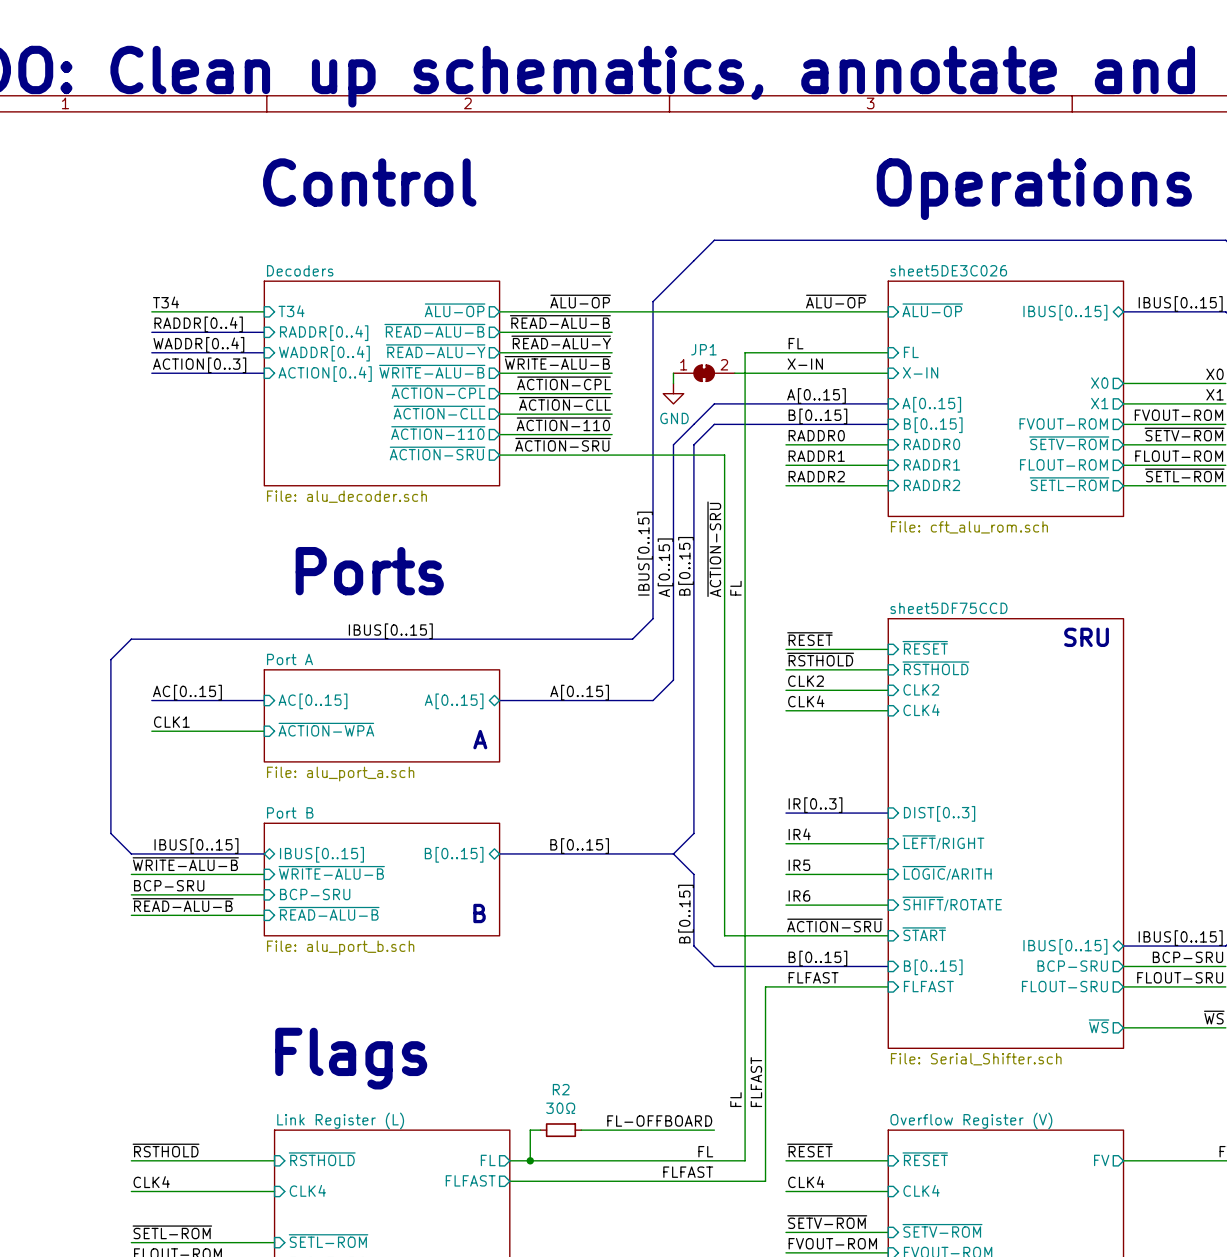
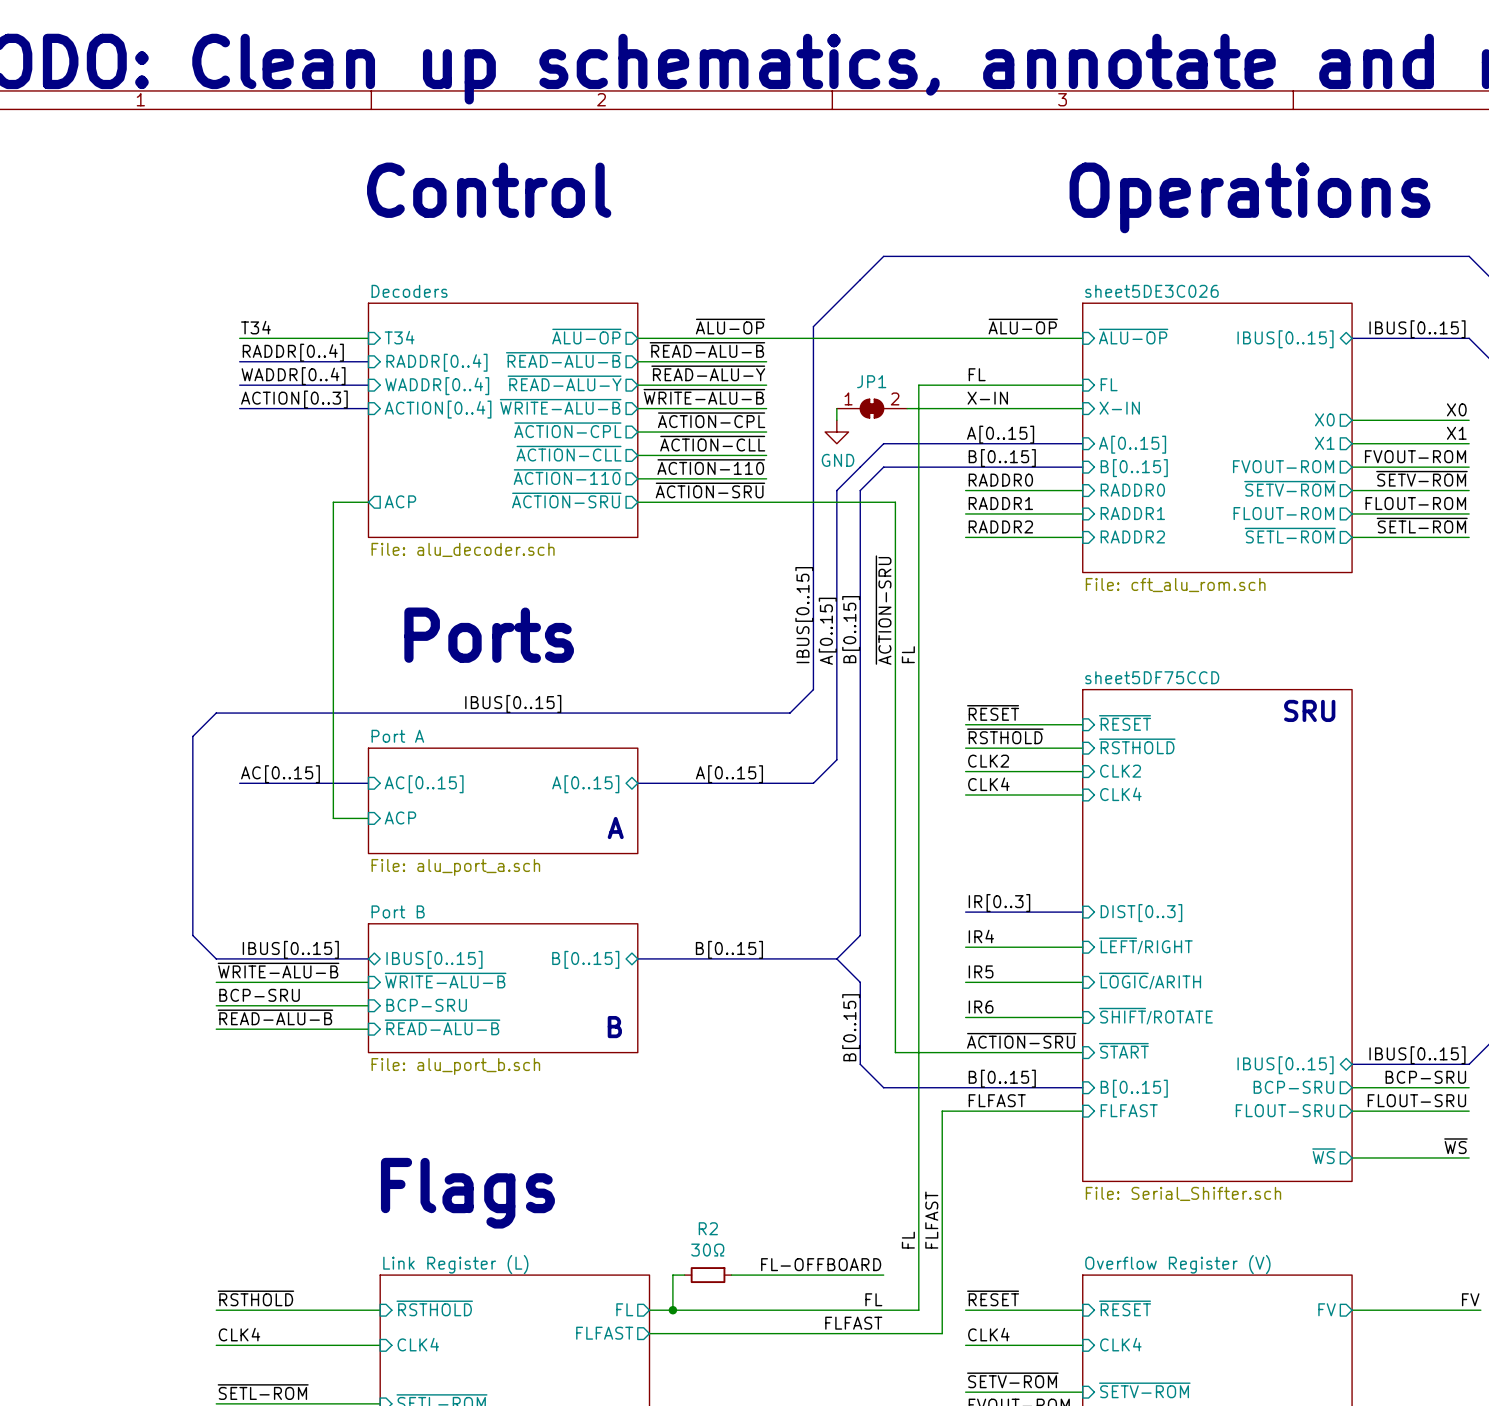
sheet pin: none -> ACP (400, 501)
label: CLK1 (171, 722) -> none
sheet pin: ~{ACTION-WPA} (326, 729) -> ACP (400, 817)
wire: (151, 731) (233, 731) -> (368, 502) (333, 502) (333, 818)

